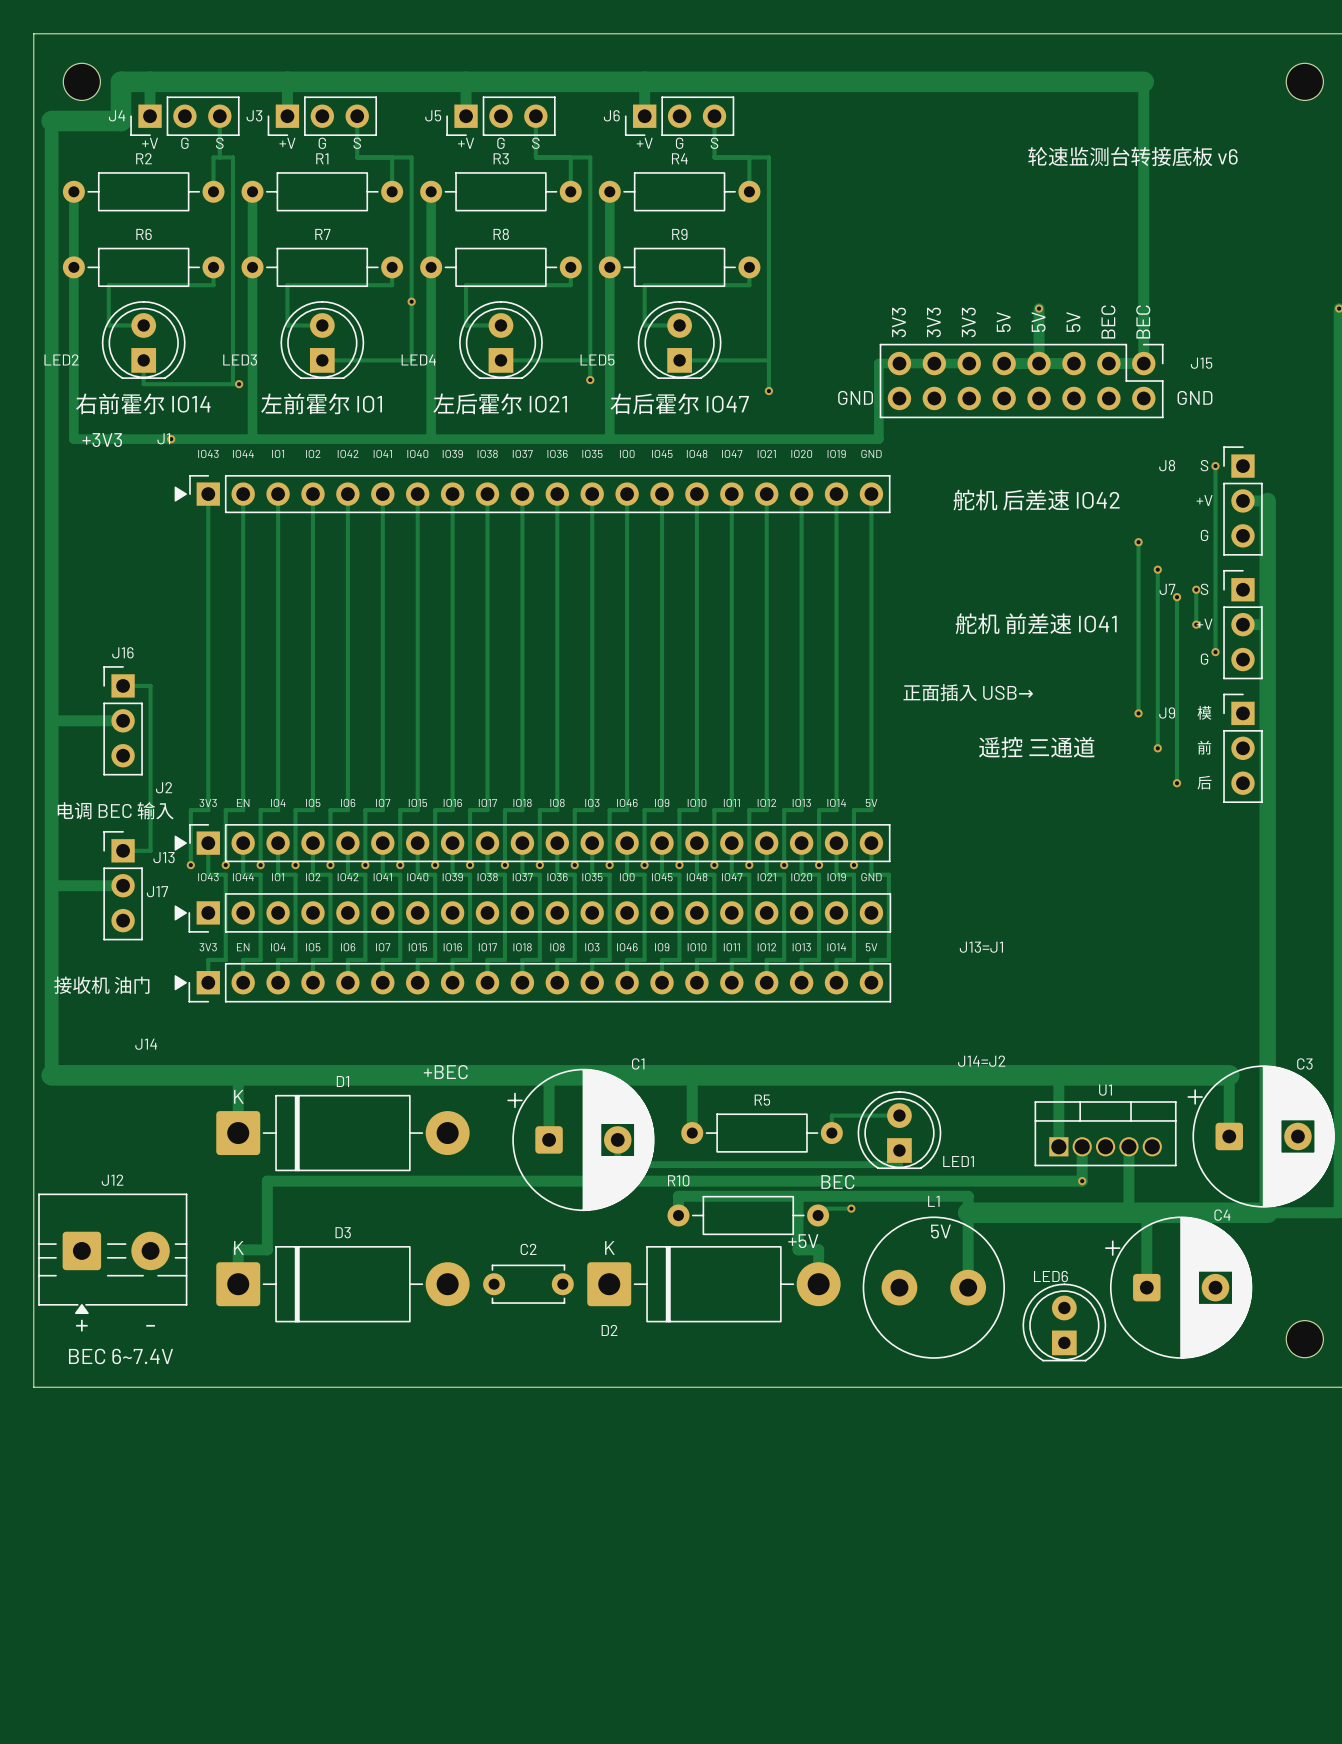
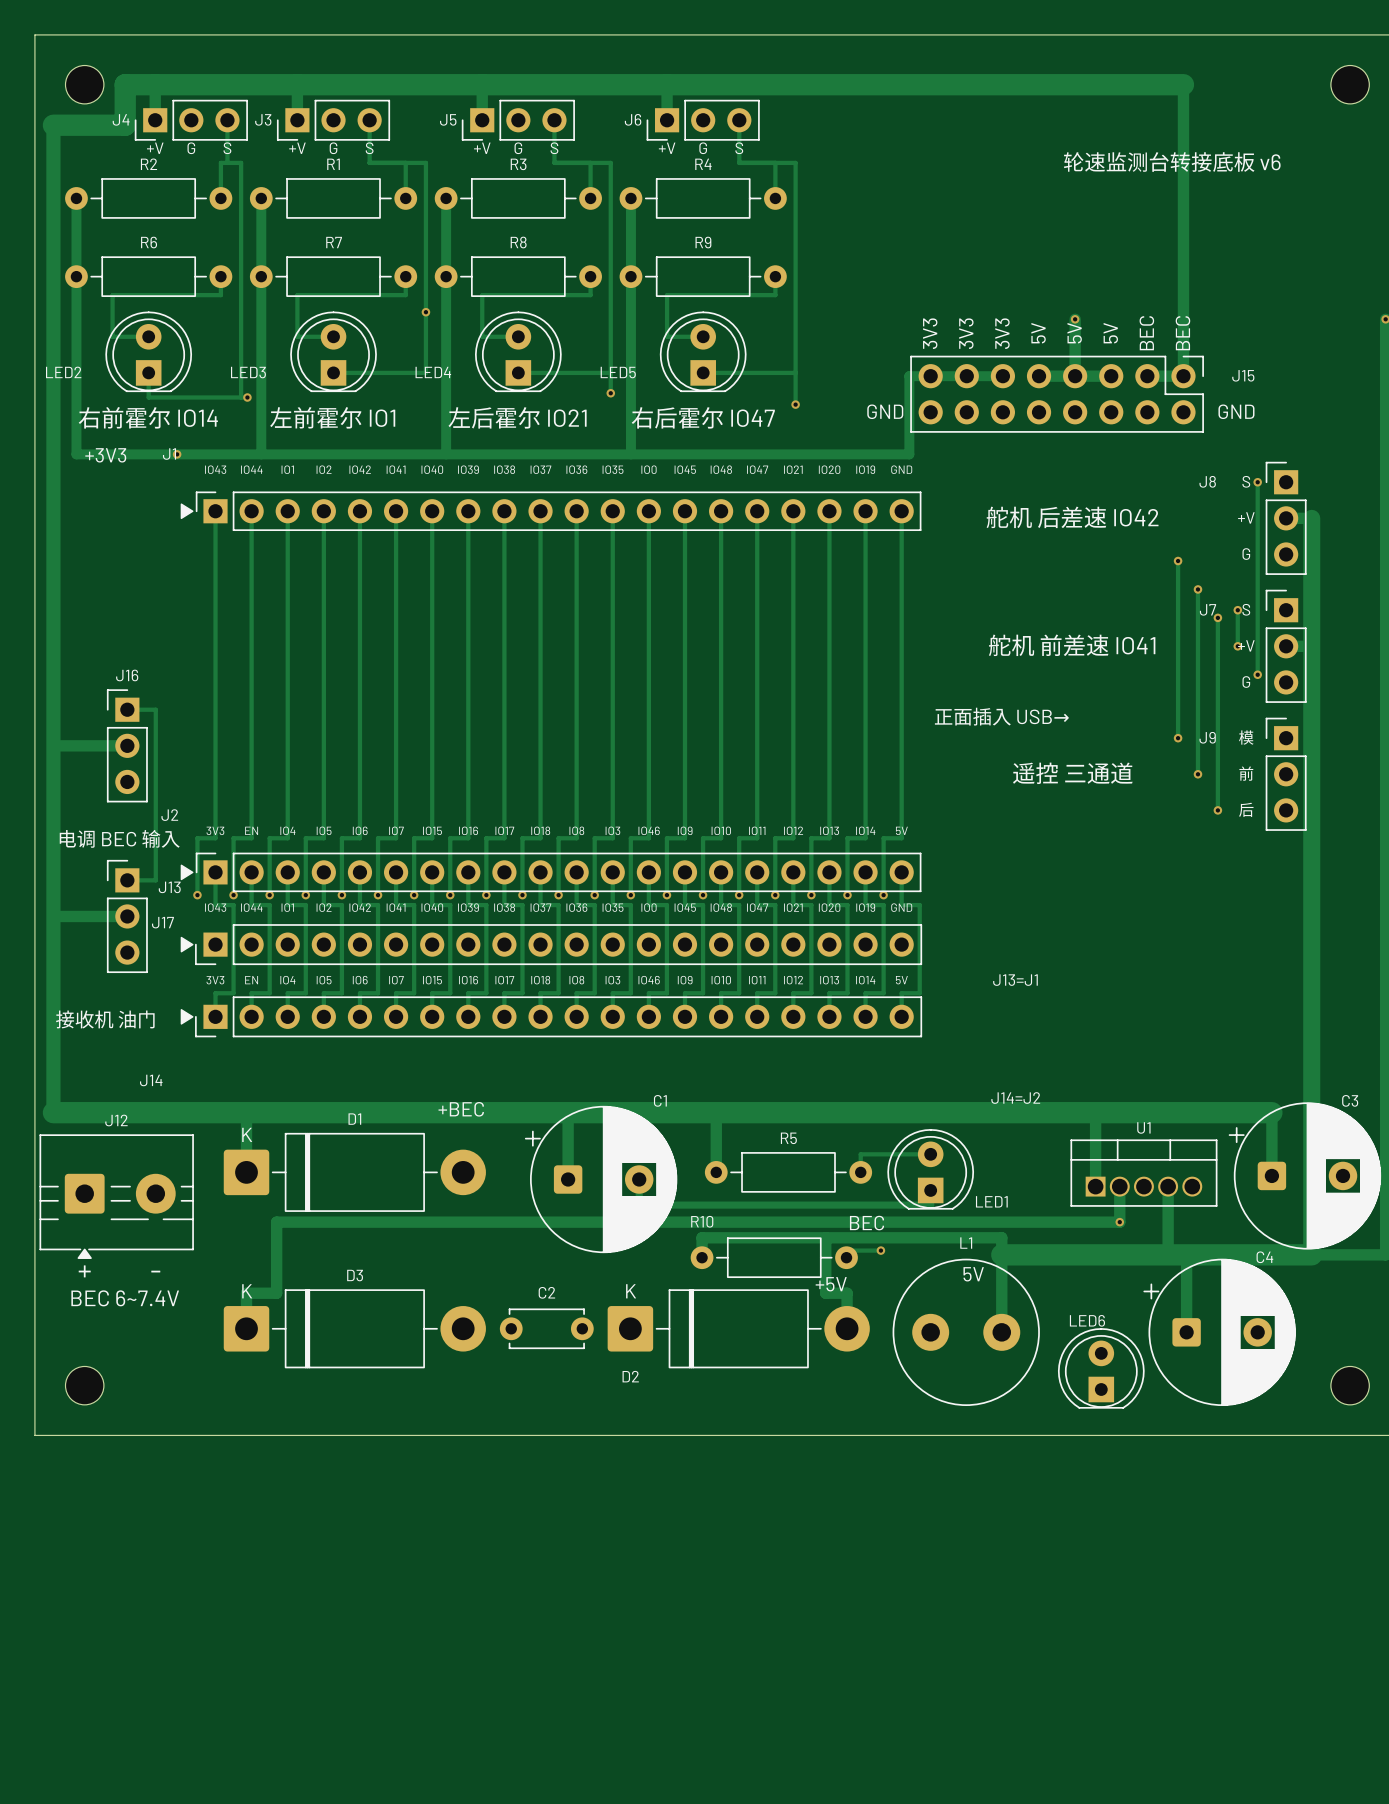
J12 position: (112, 1253) -> (116, 1196)
text position: + (81, 1325) -> + (84, 1271)
text position: - (150, 1325) -> - (155, 1271)
part: none -> (84, 1385)
text position: BEC 6~7.4V (120, 1356) -> BEC 6~7.4V (125, 1298)

